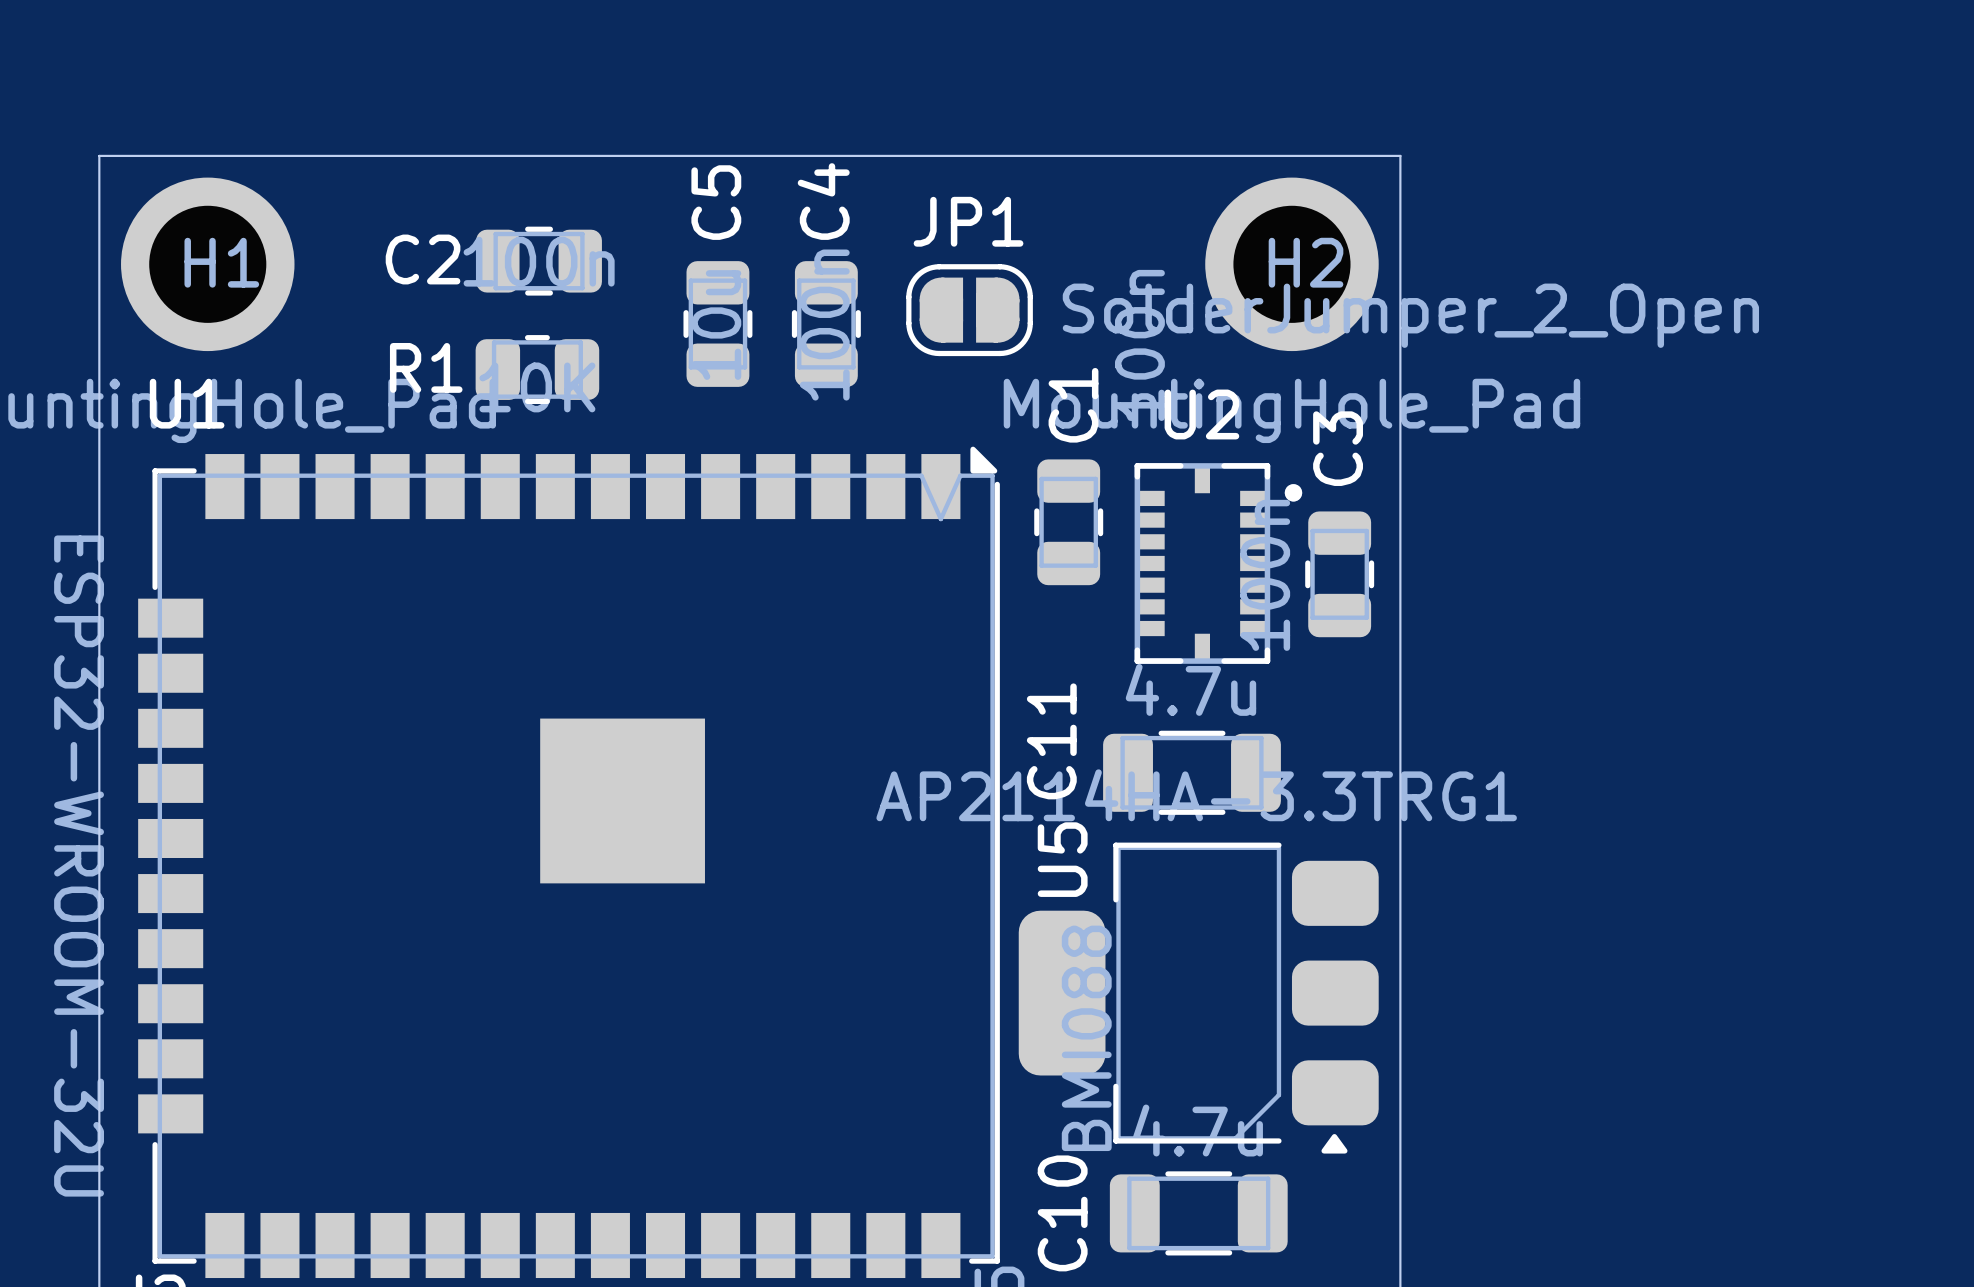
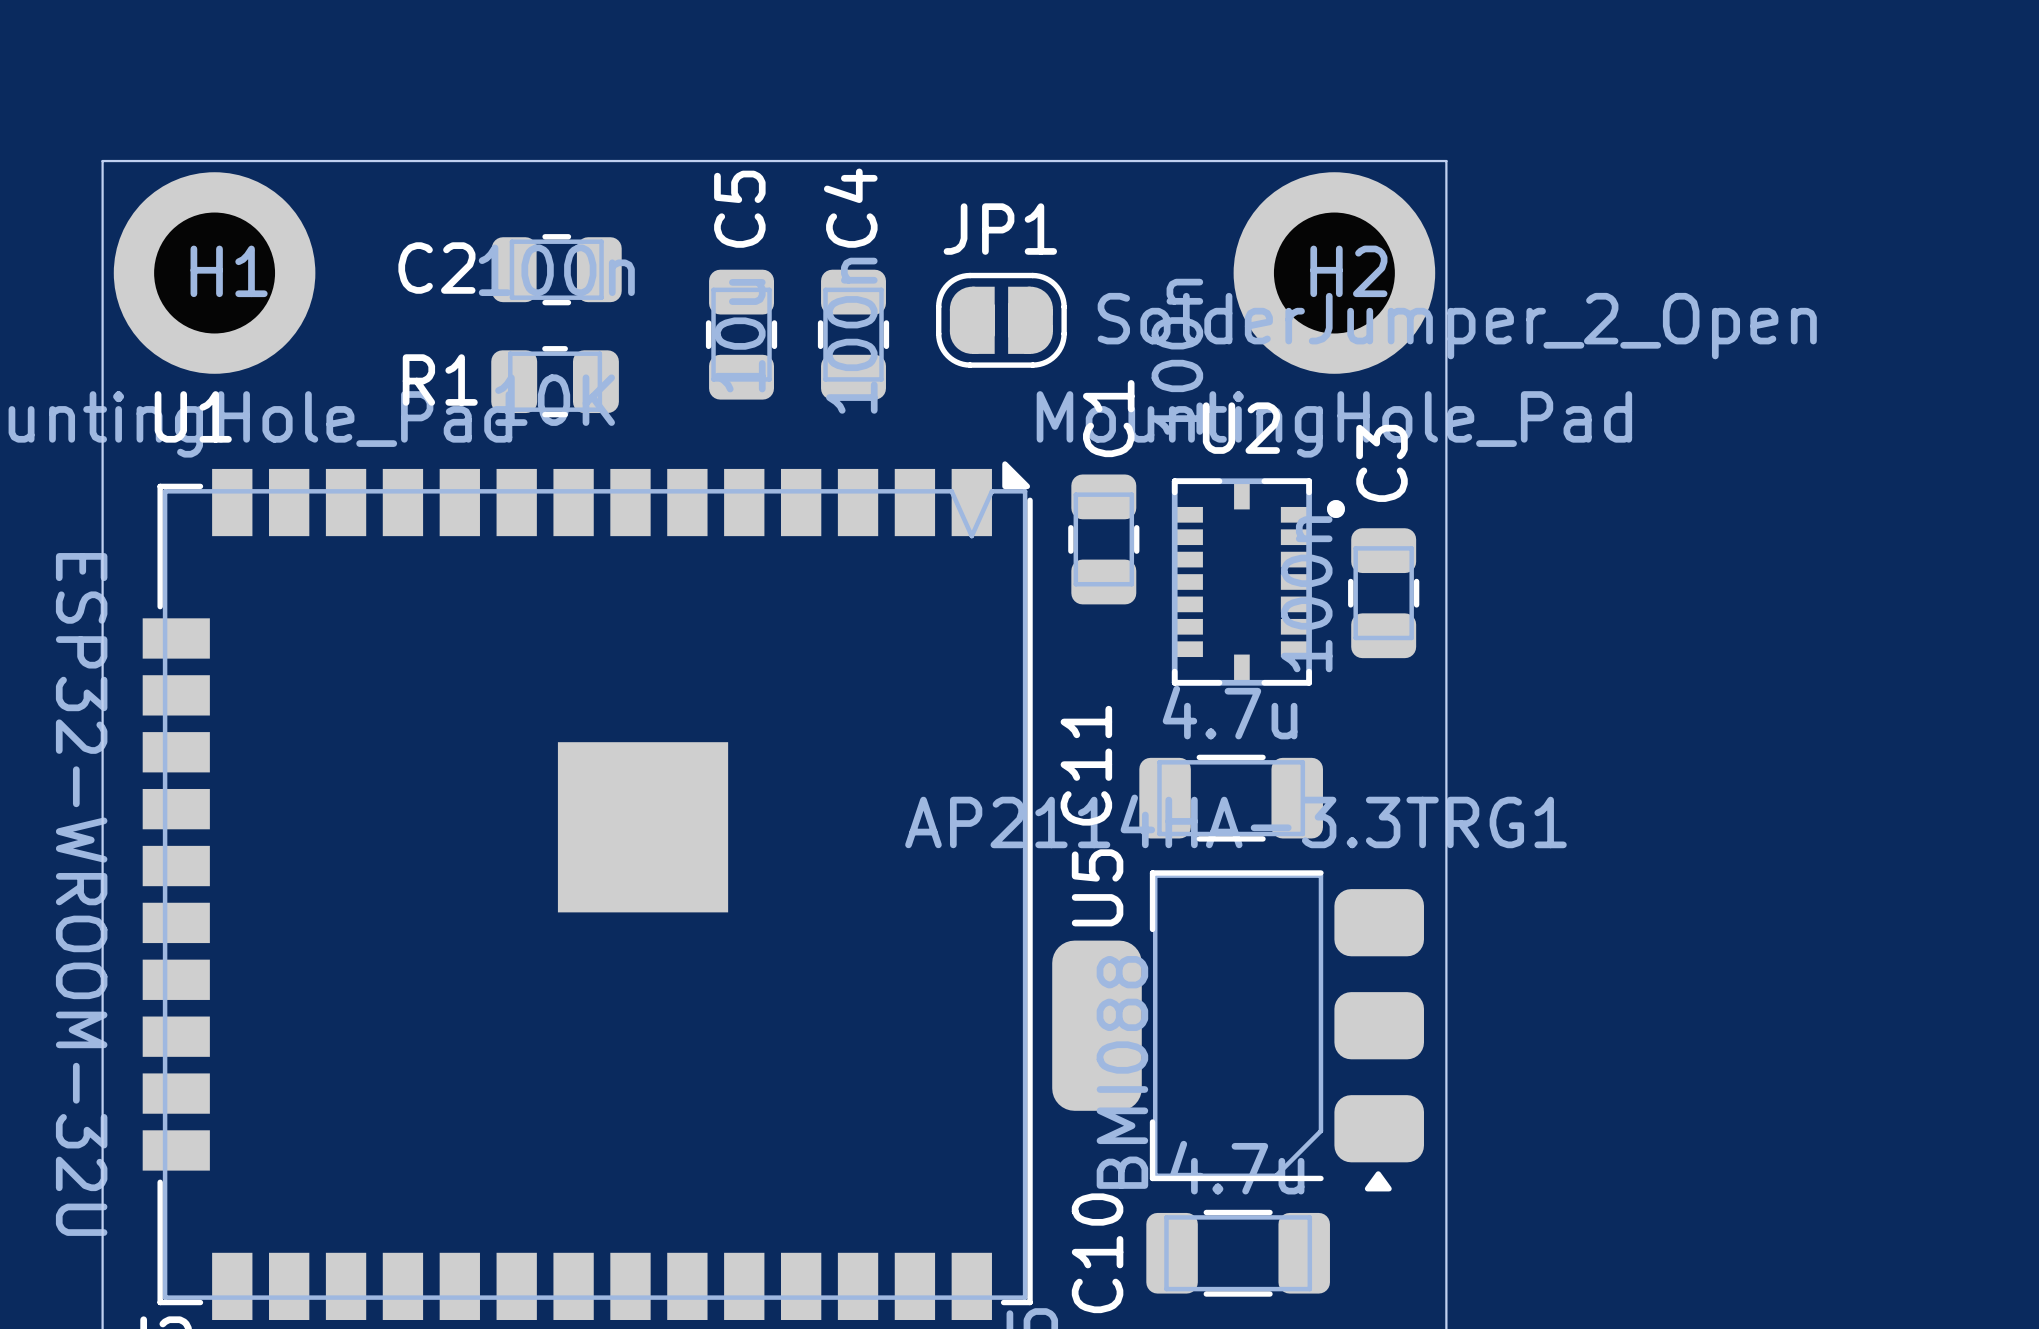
H1 footprint: [121, 177, 295, 352] -> [113, 172, 316, 374]
H2 footprint: [1205, 177, 1379, 352] -> [1233, 172, 1436, 374]

